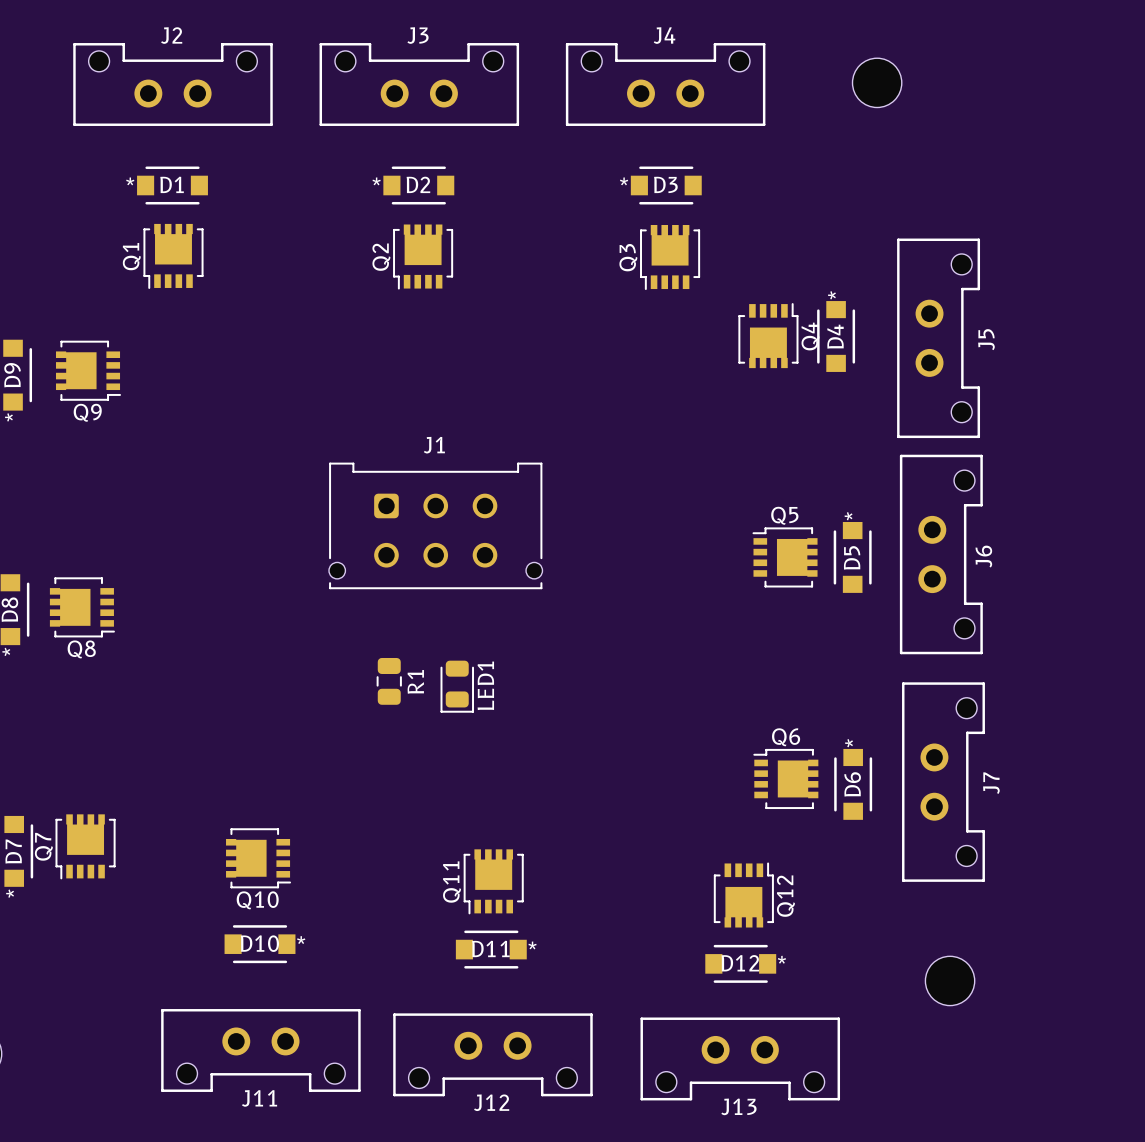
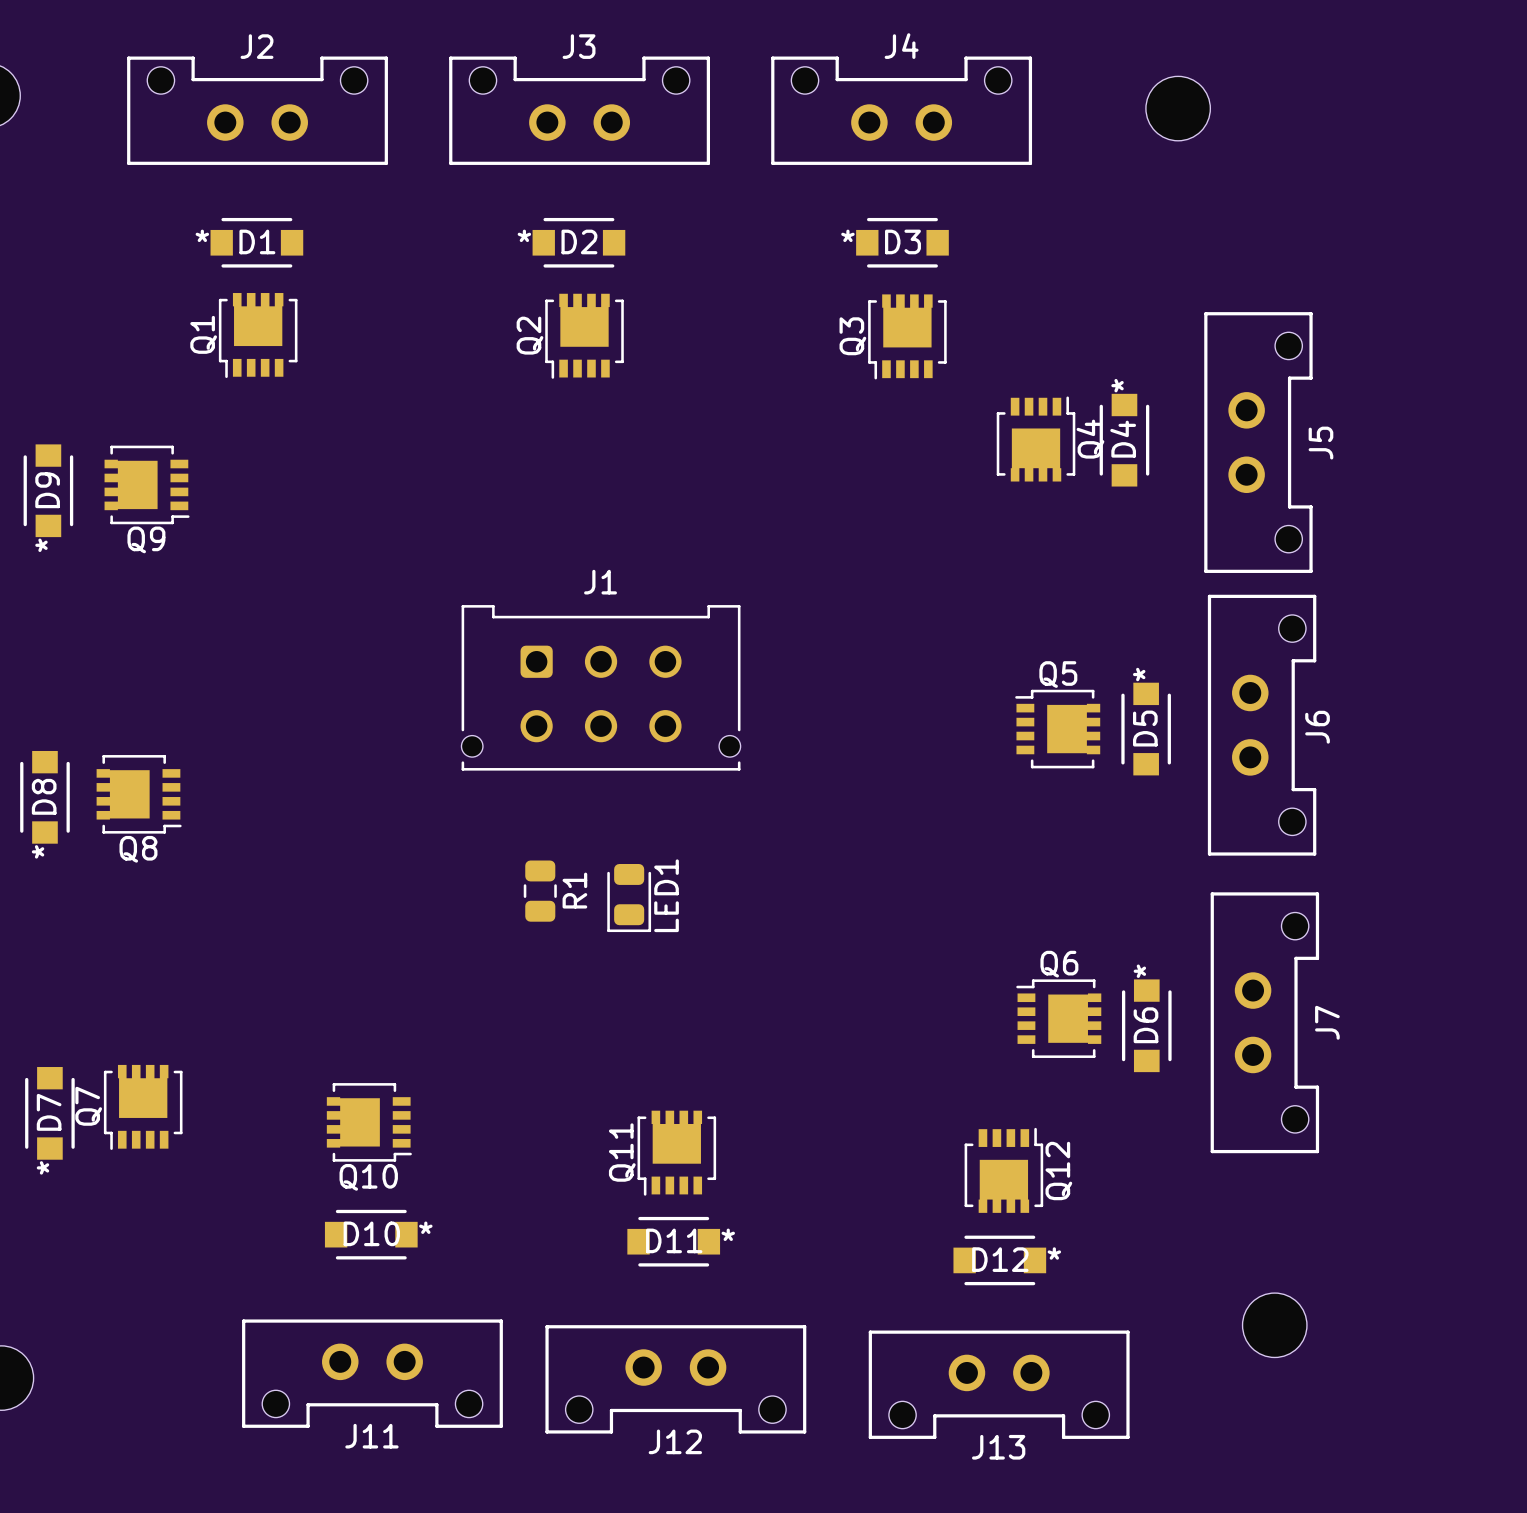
part position: (950, 980) -> (1274, 1325)

